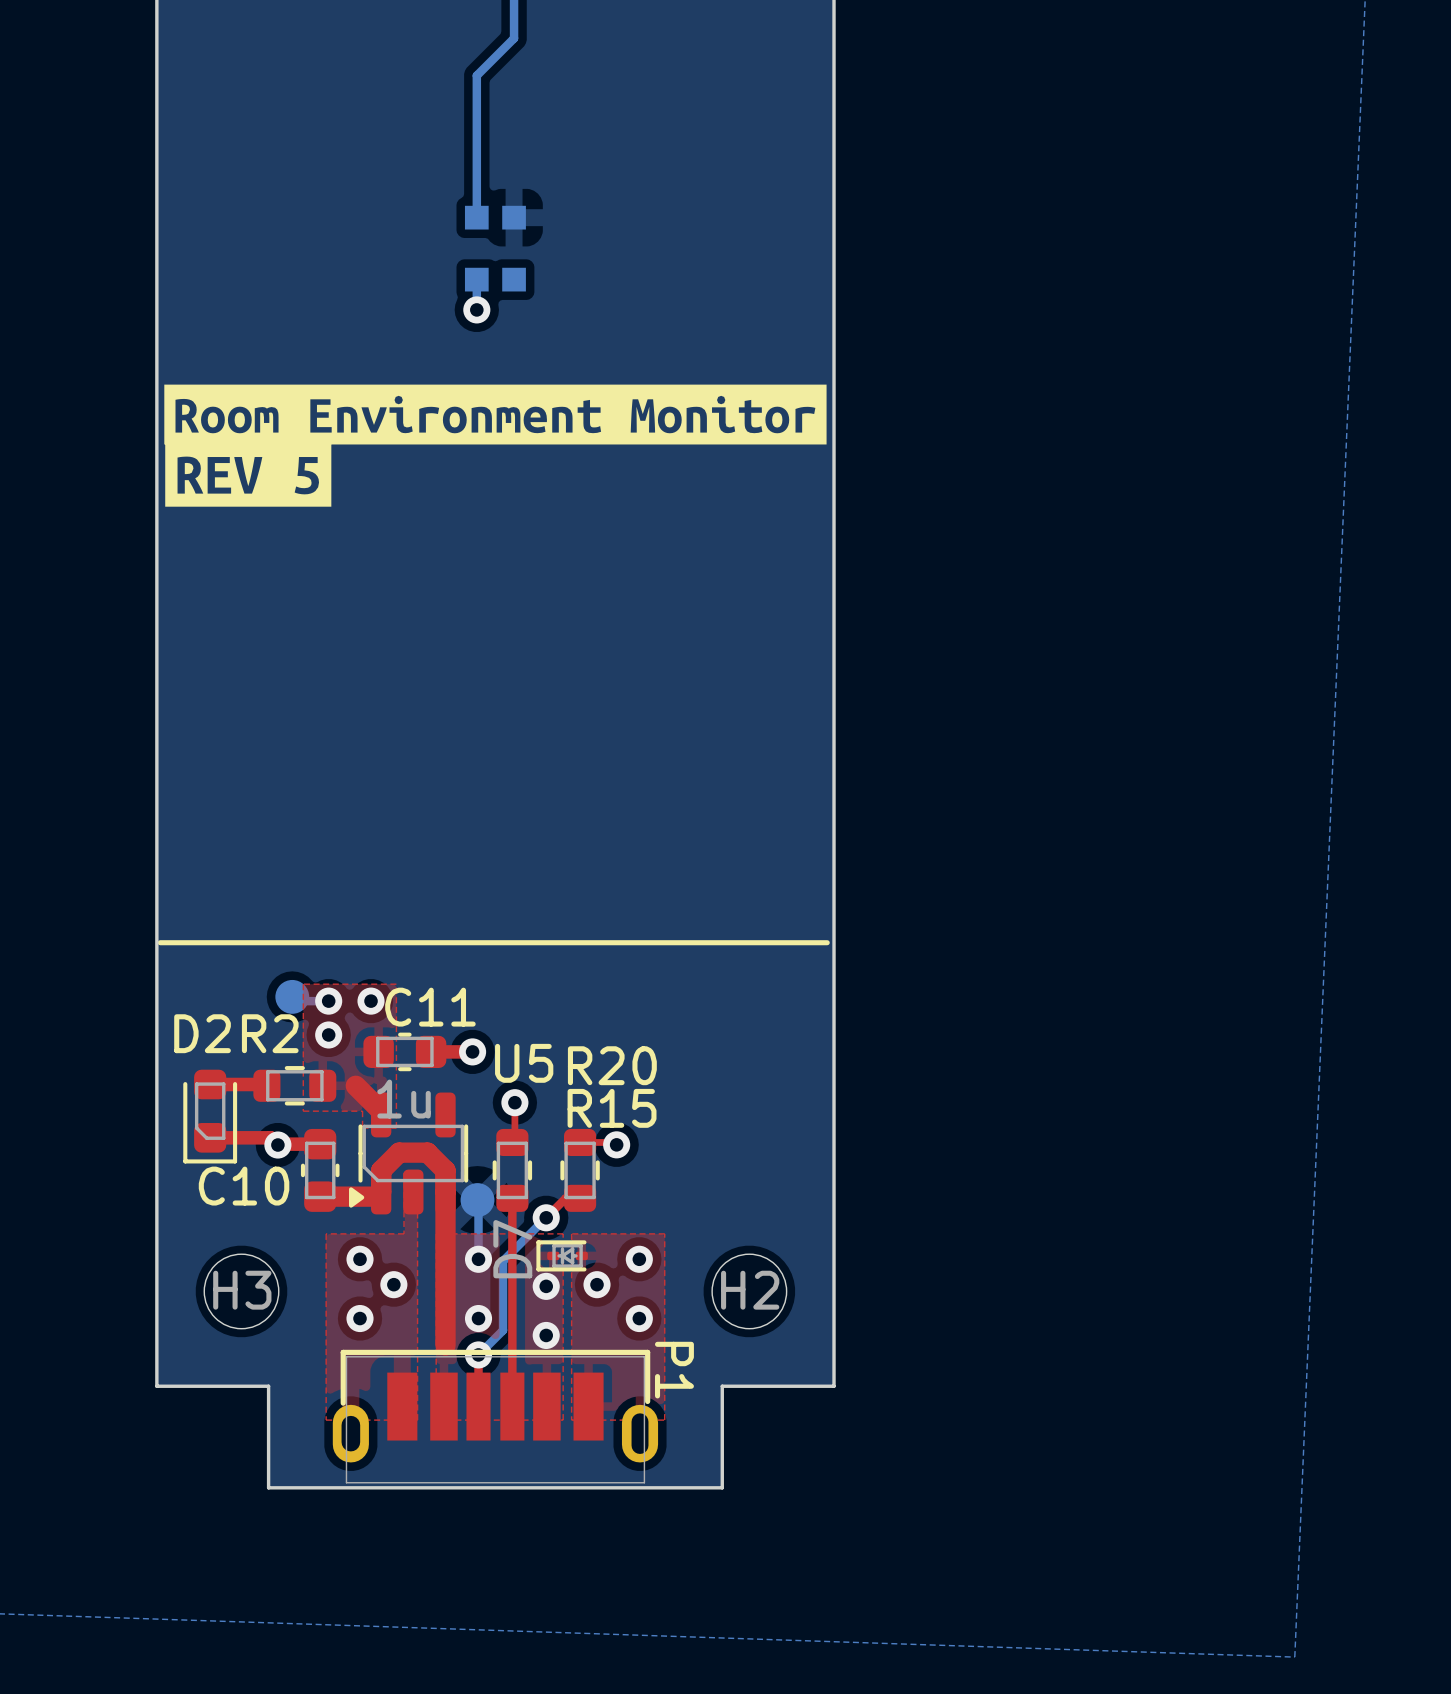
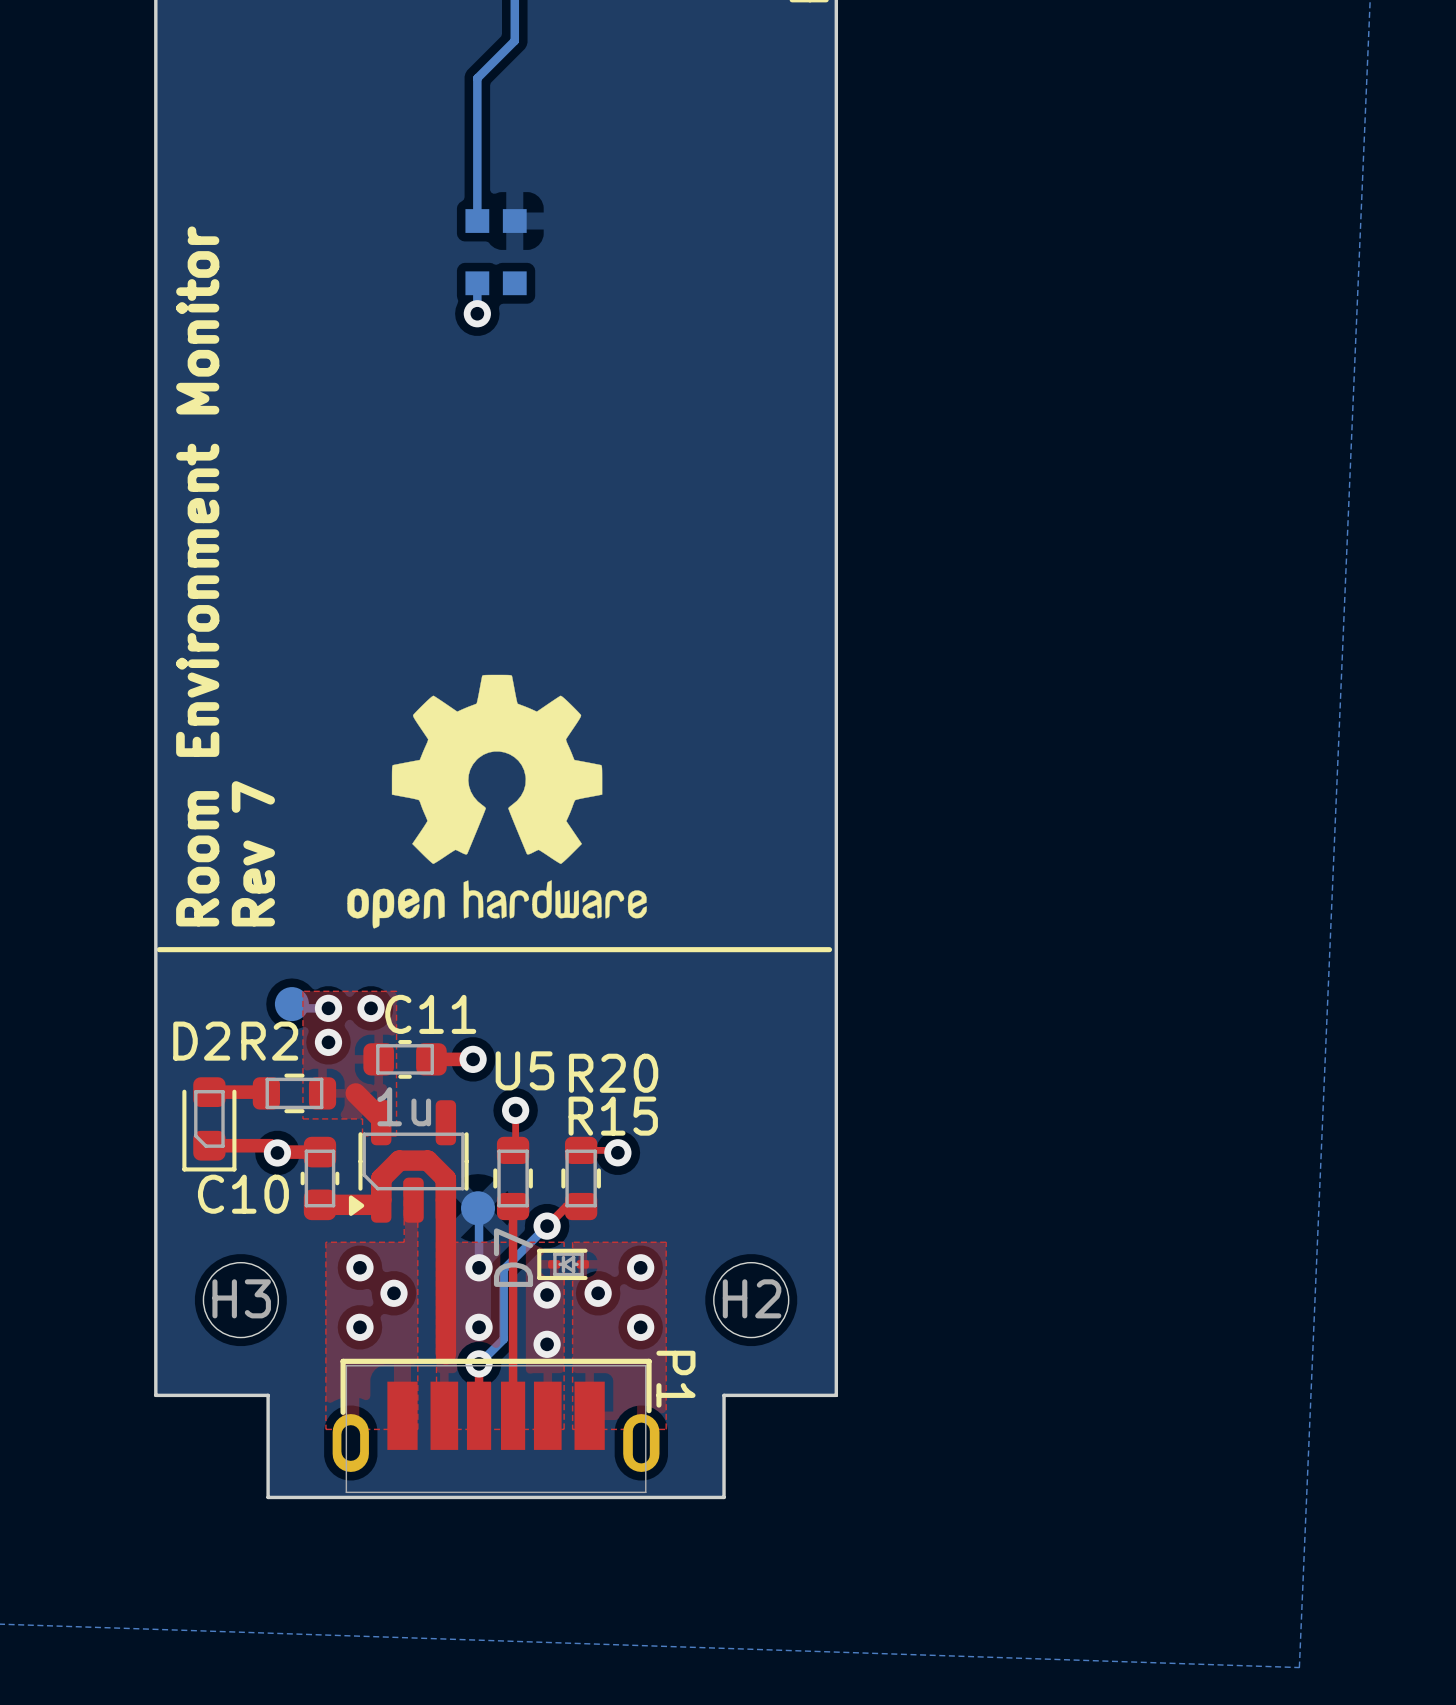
drawing: [164, 384, 827, 507] -> none
text: none -> Room Environment Monitor (197, 576)
drawing: none -> [347, 674, 647, 929]
text: none -> Rev 7 (253, 853)

